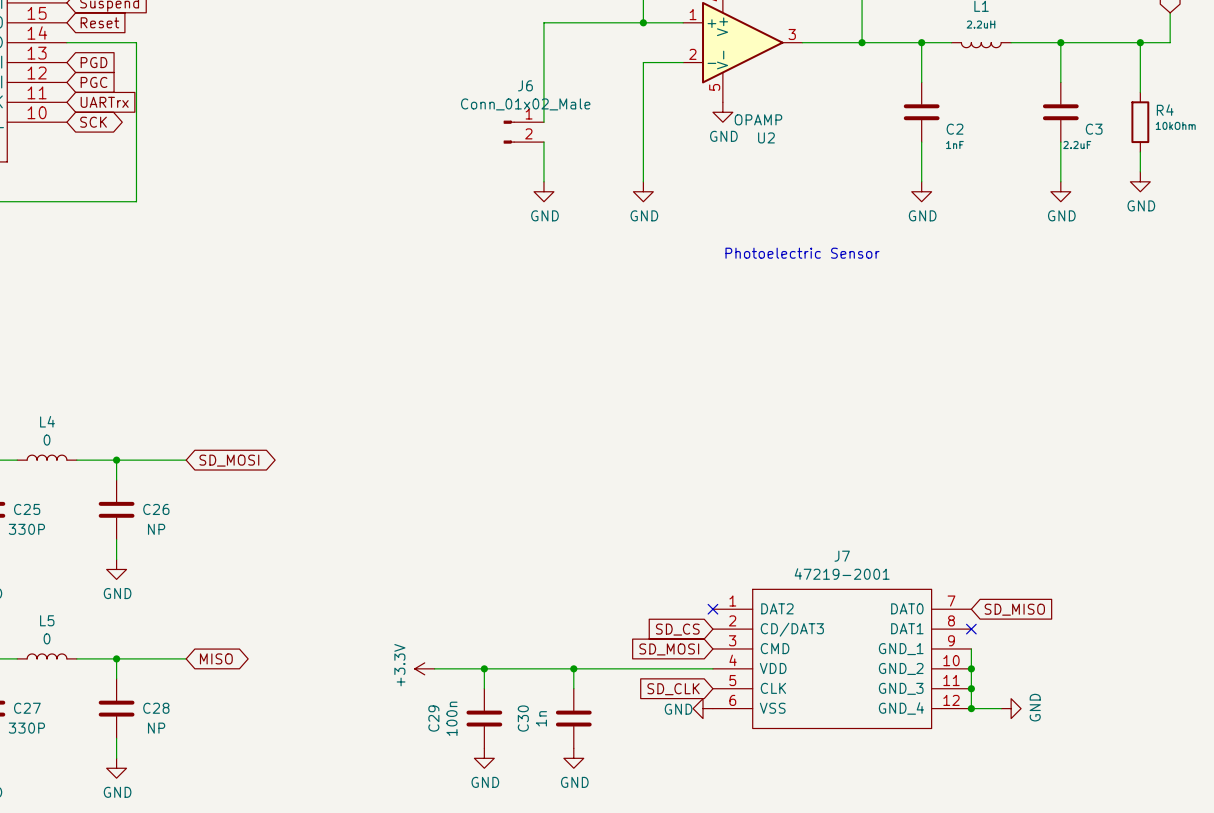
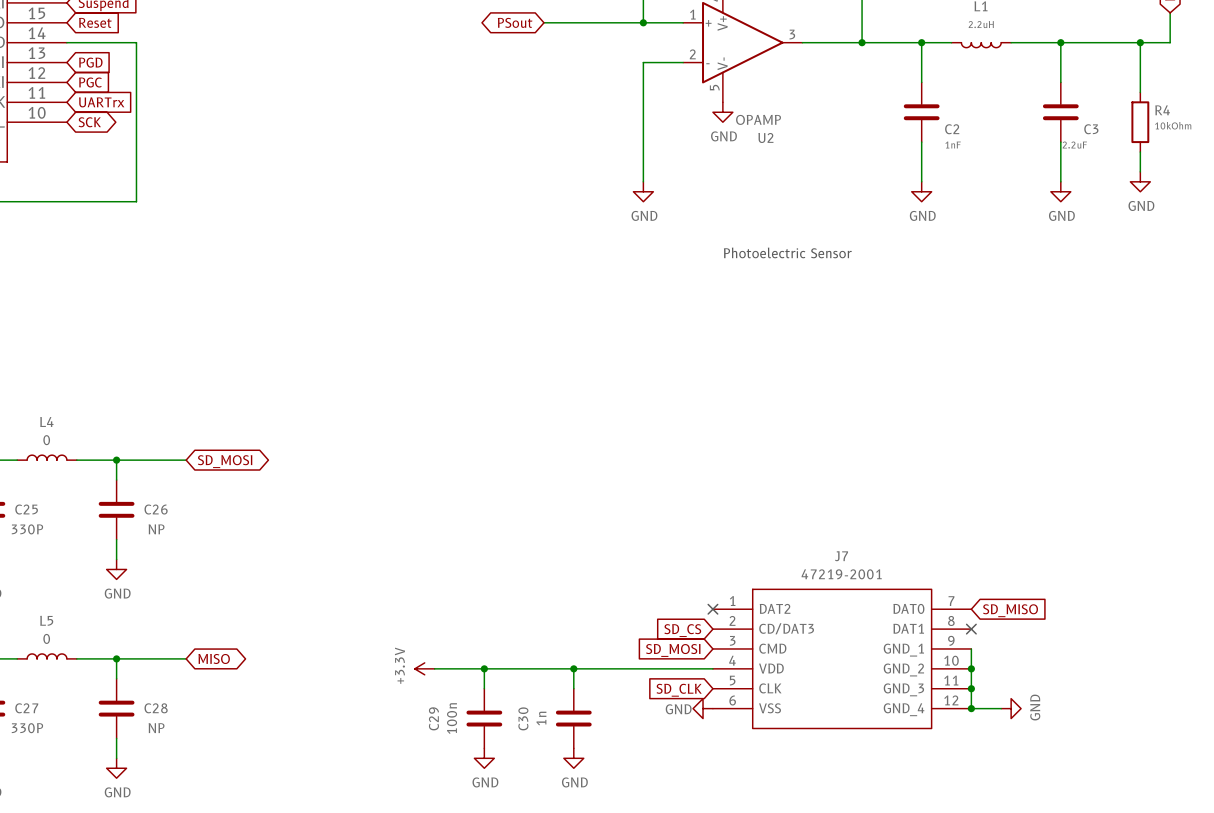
global label: none -> PSout (515, 22)
wire: (543, 22) (543, 122) -> none
J6: Conn_01x02_Male (523, 132) -> none
wire: (543, 142) (543, 181) -> none
power symbol: GND (543, 191) -> none

